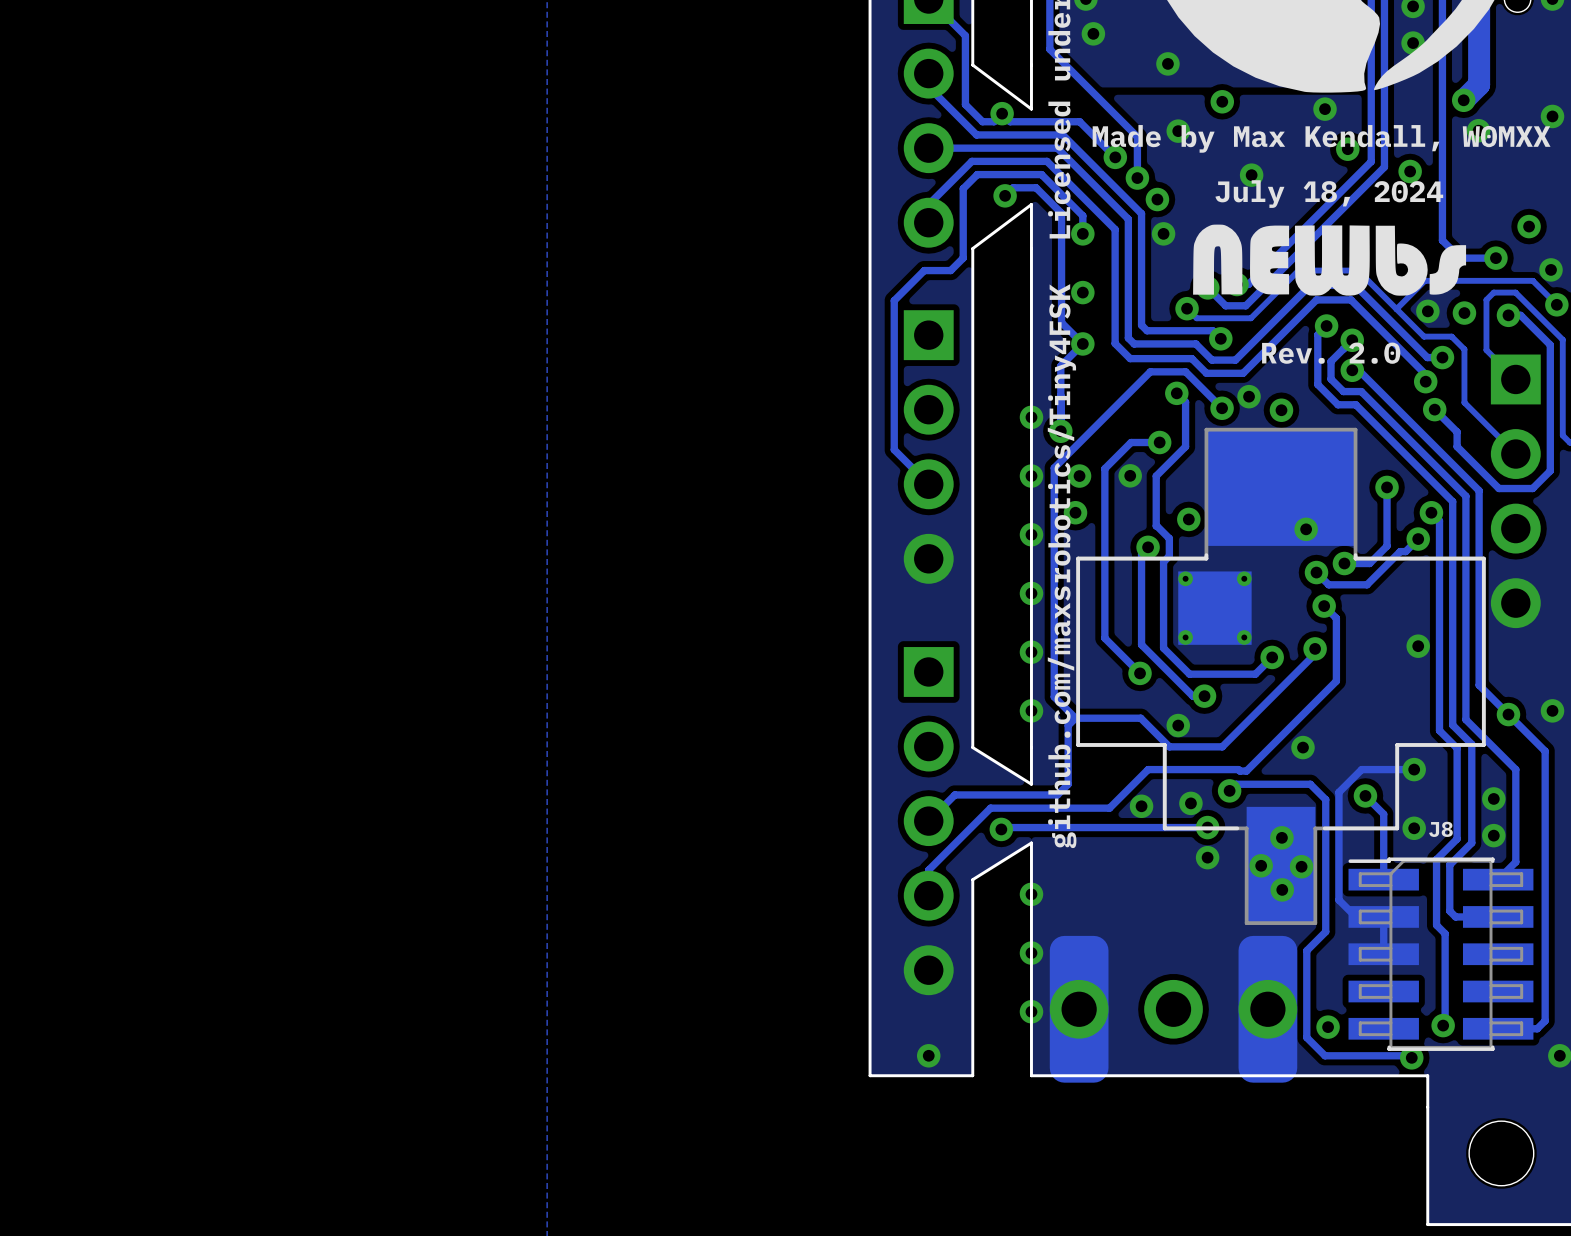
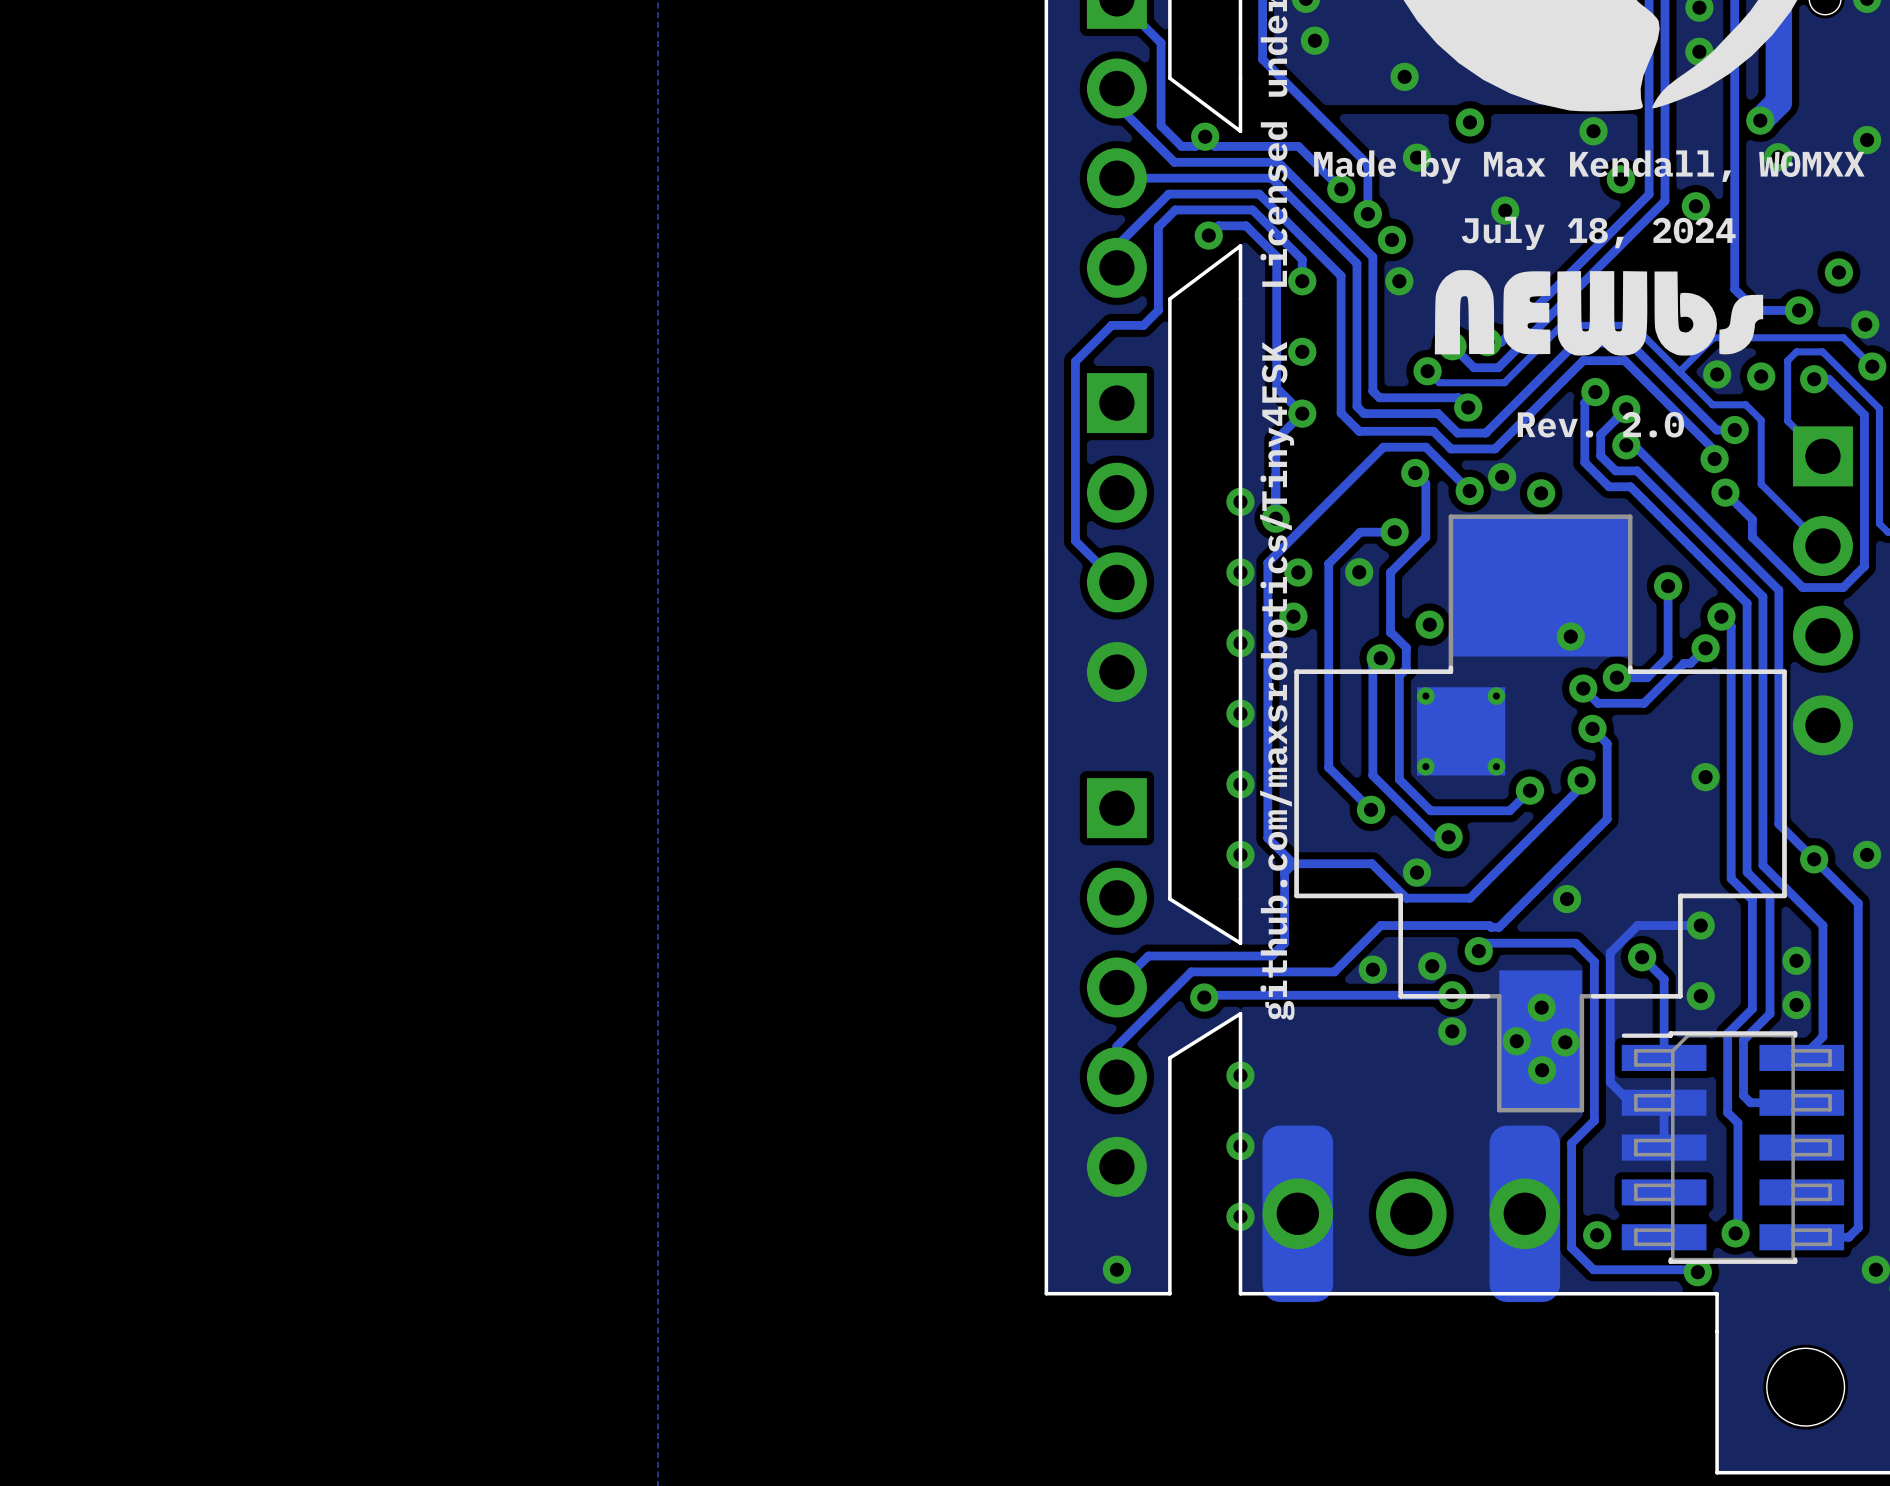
J8 name: J8 (1440, 829) -> none

